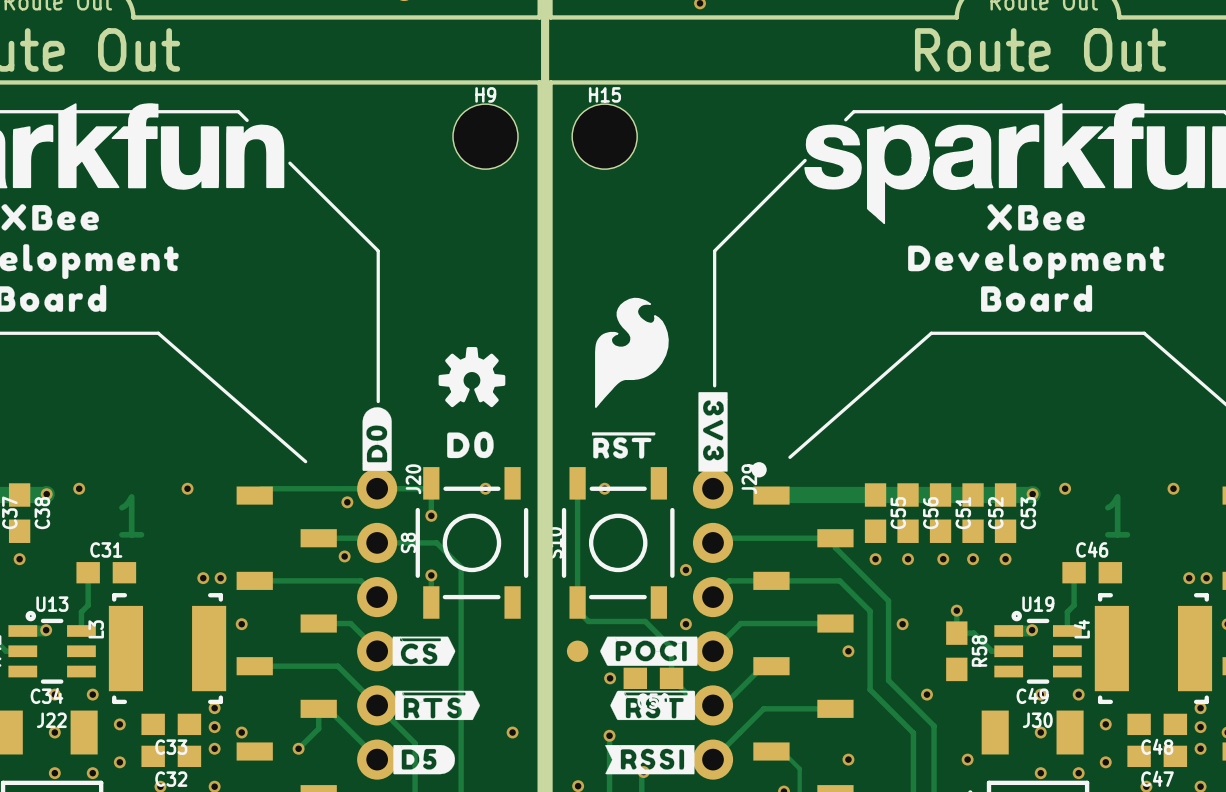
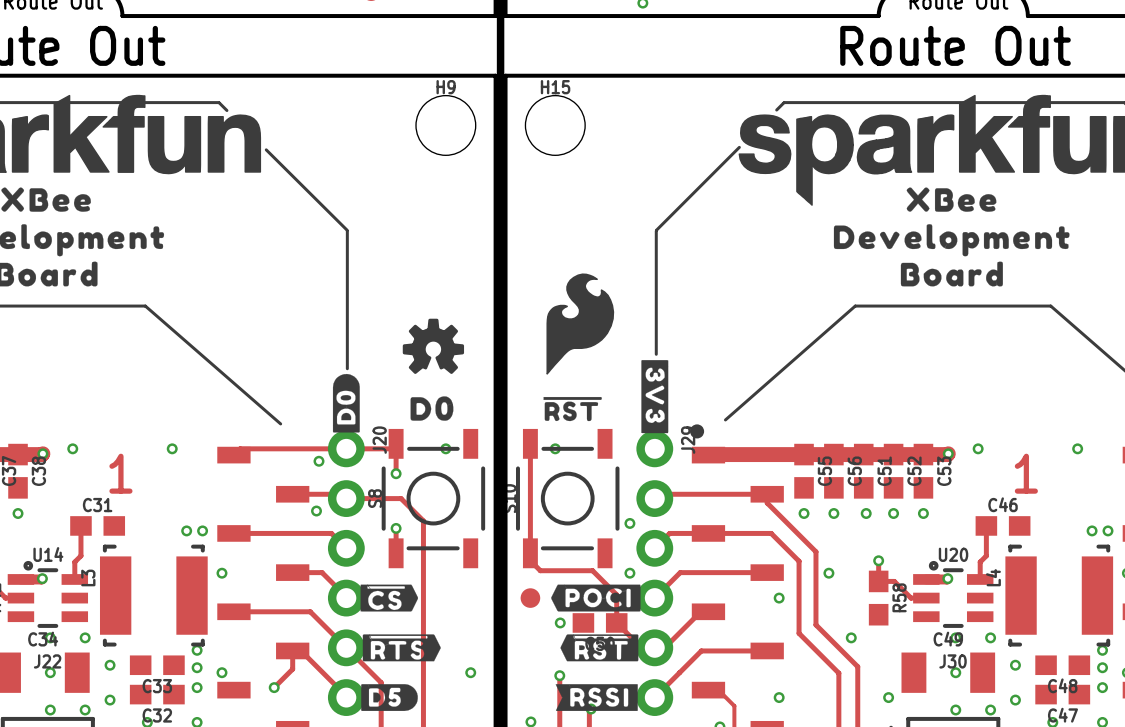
U13 name: U13 (52, 604) -> U14 (48, 554)
U19 name: U19 (1038, 604) -> U20 (953, 554)

